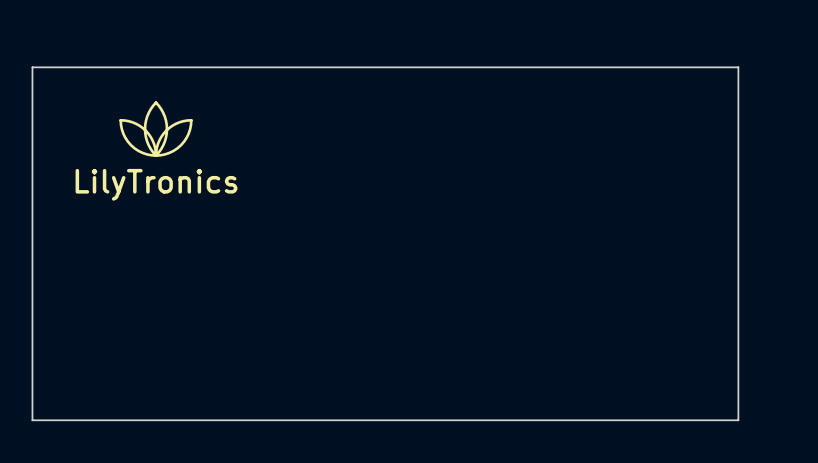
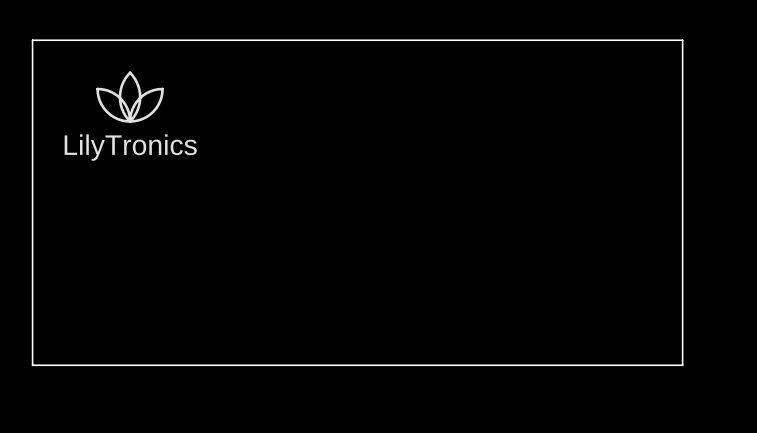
drawing shape: [75, 101, 238, 201] -> [64, 71, 197, 161]

